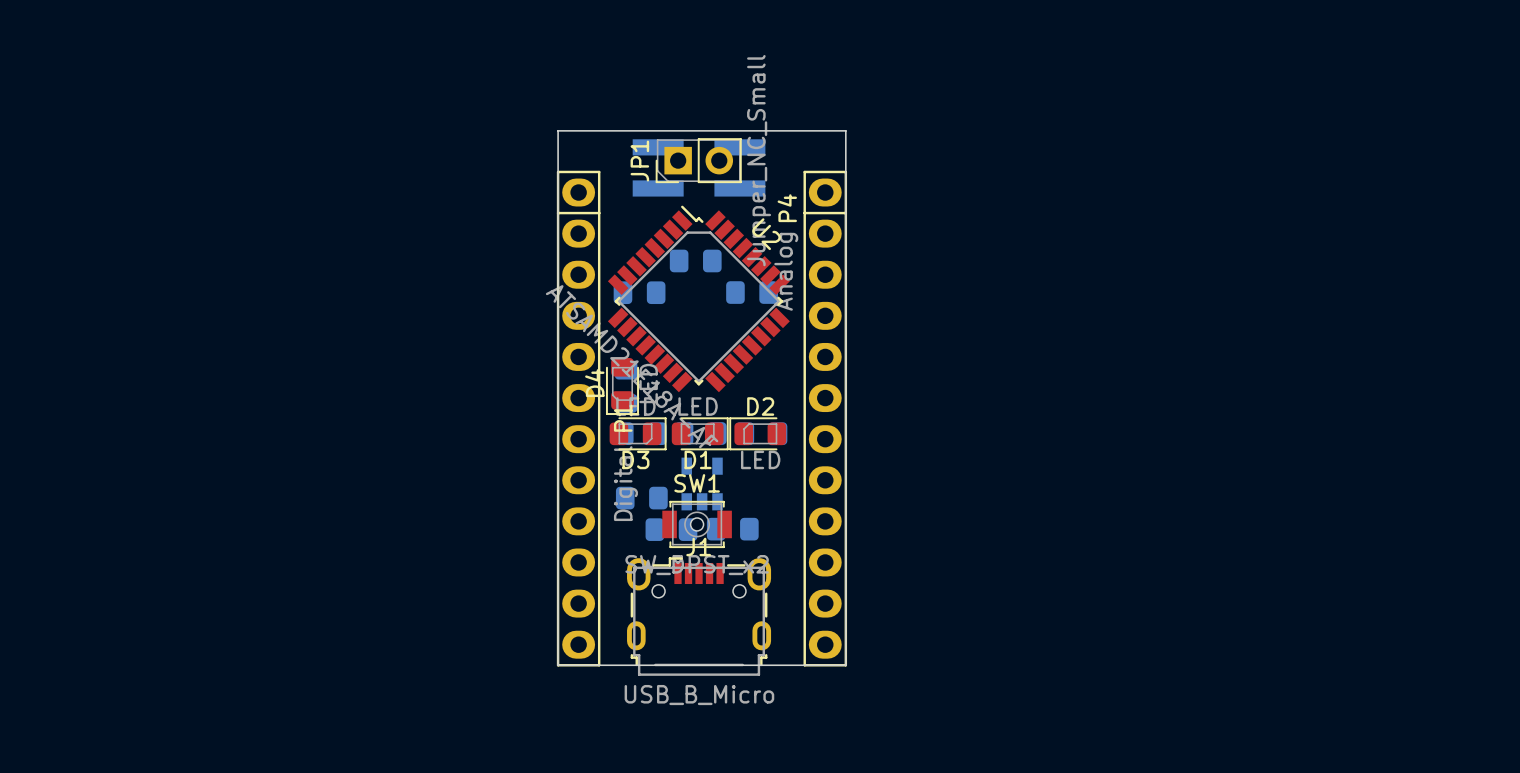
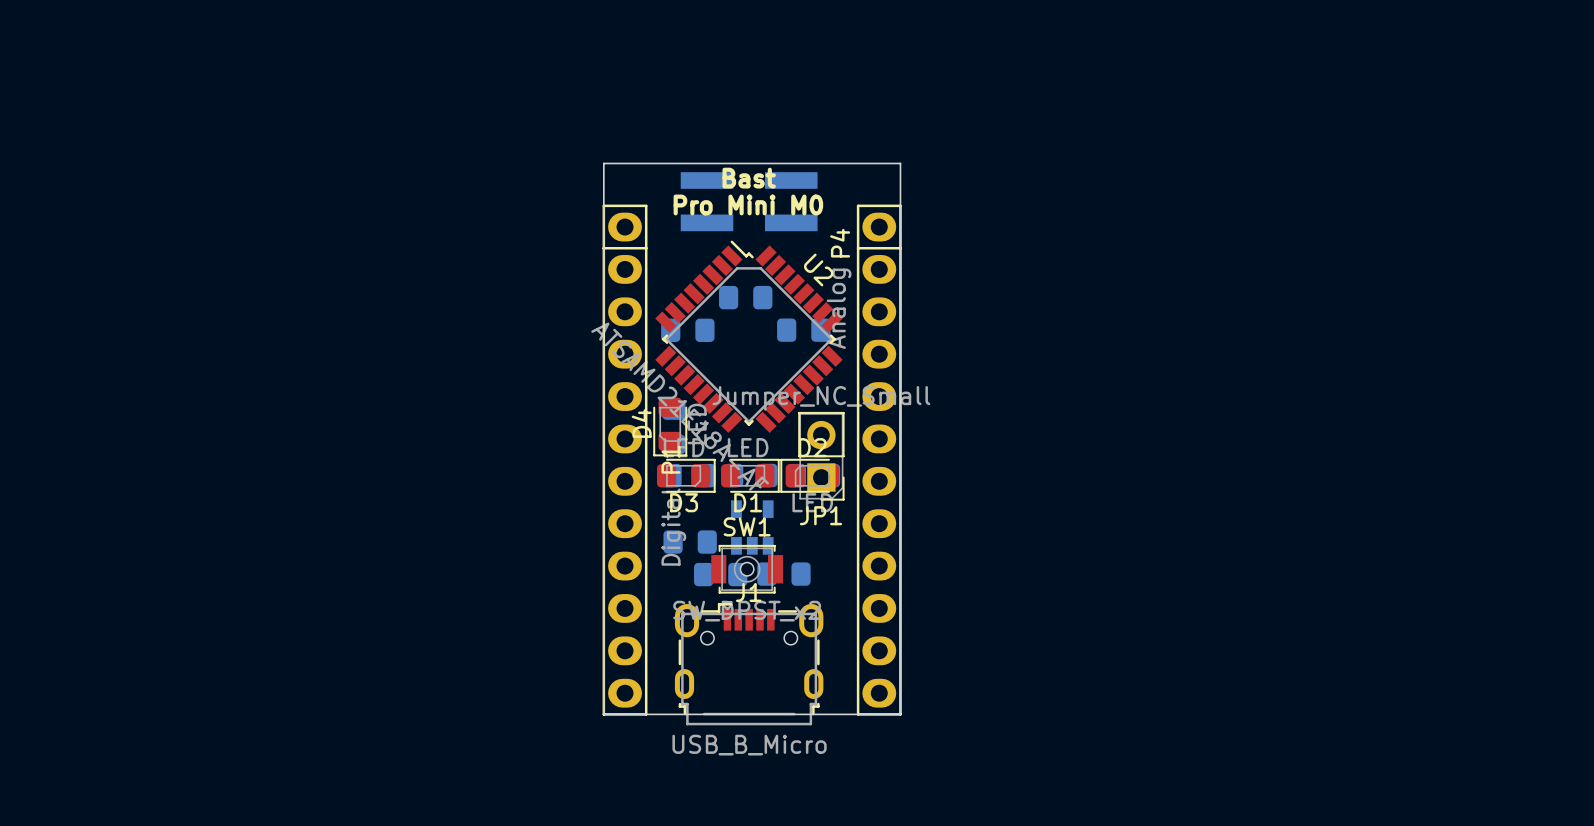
text: none -> Bast (749, 178)
JP1 rotation: 0° (698, 160) -> 90° counterclockwise (821, 456)
JP1 position: (698, 160) -> (821, 456)
text: none -> Pro Mini M0 (748, 204)

